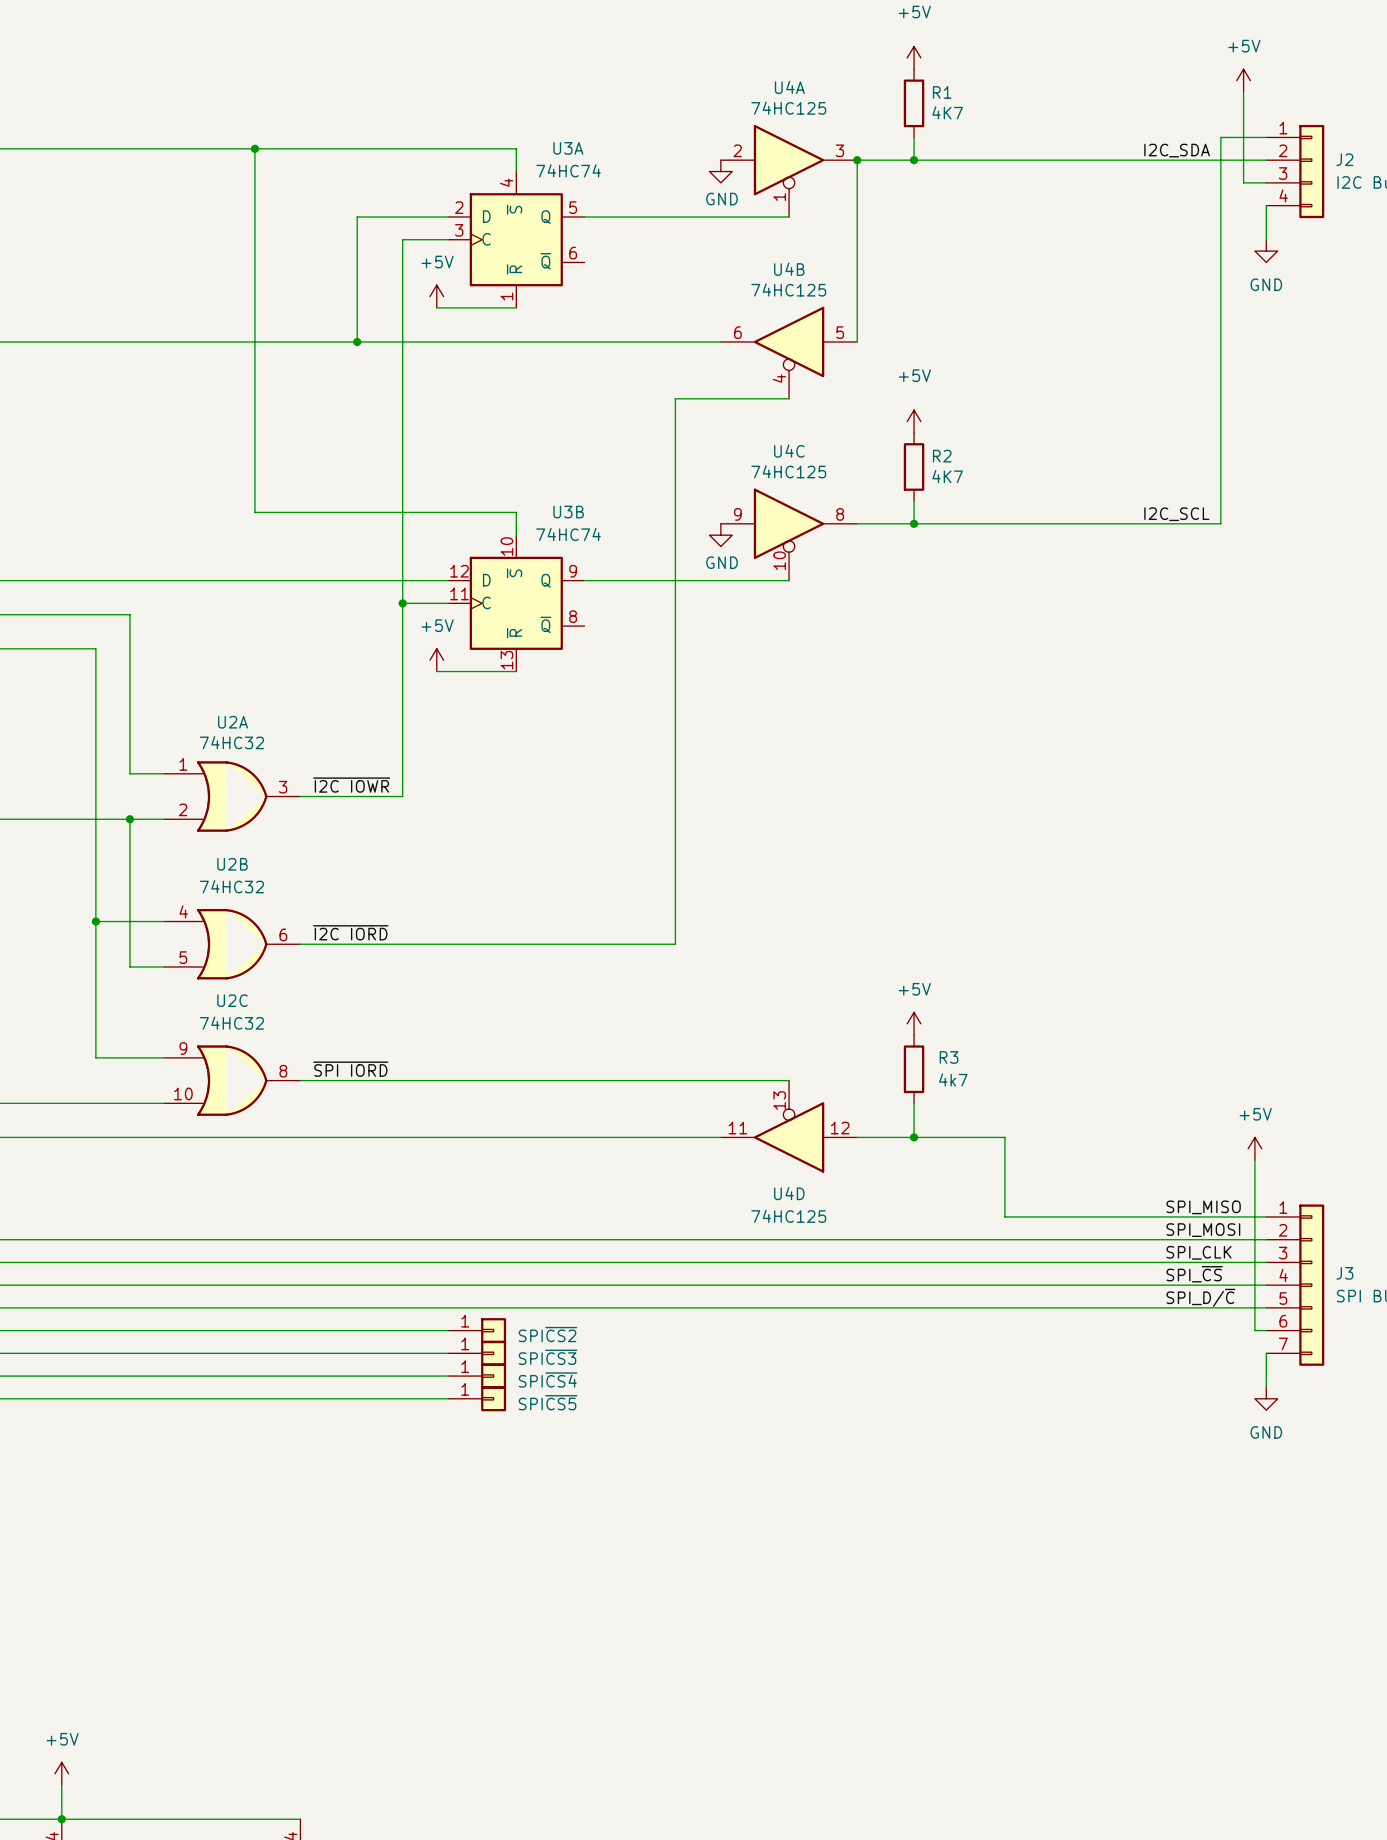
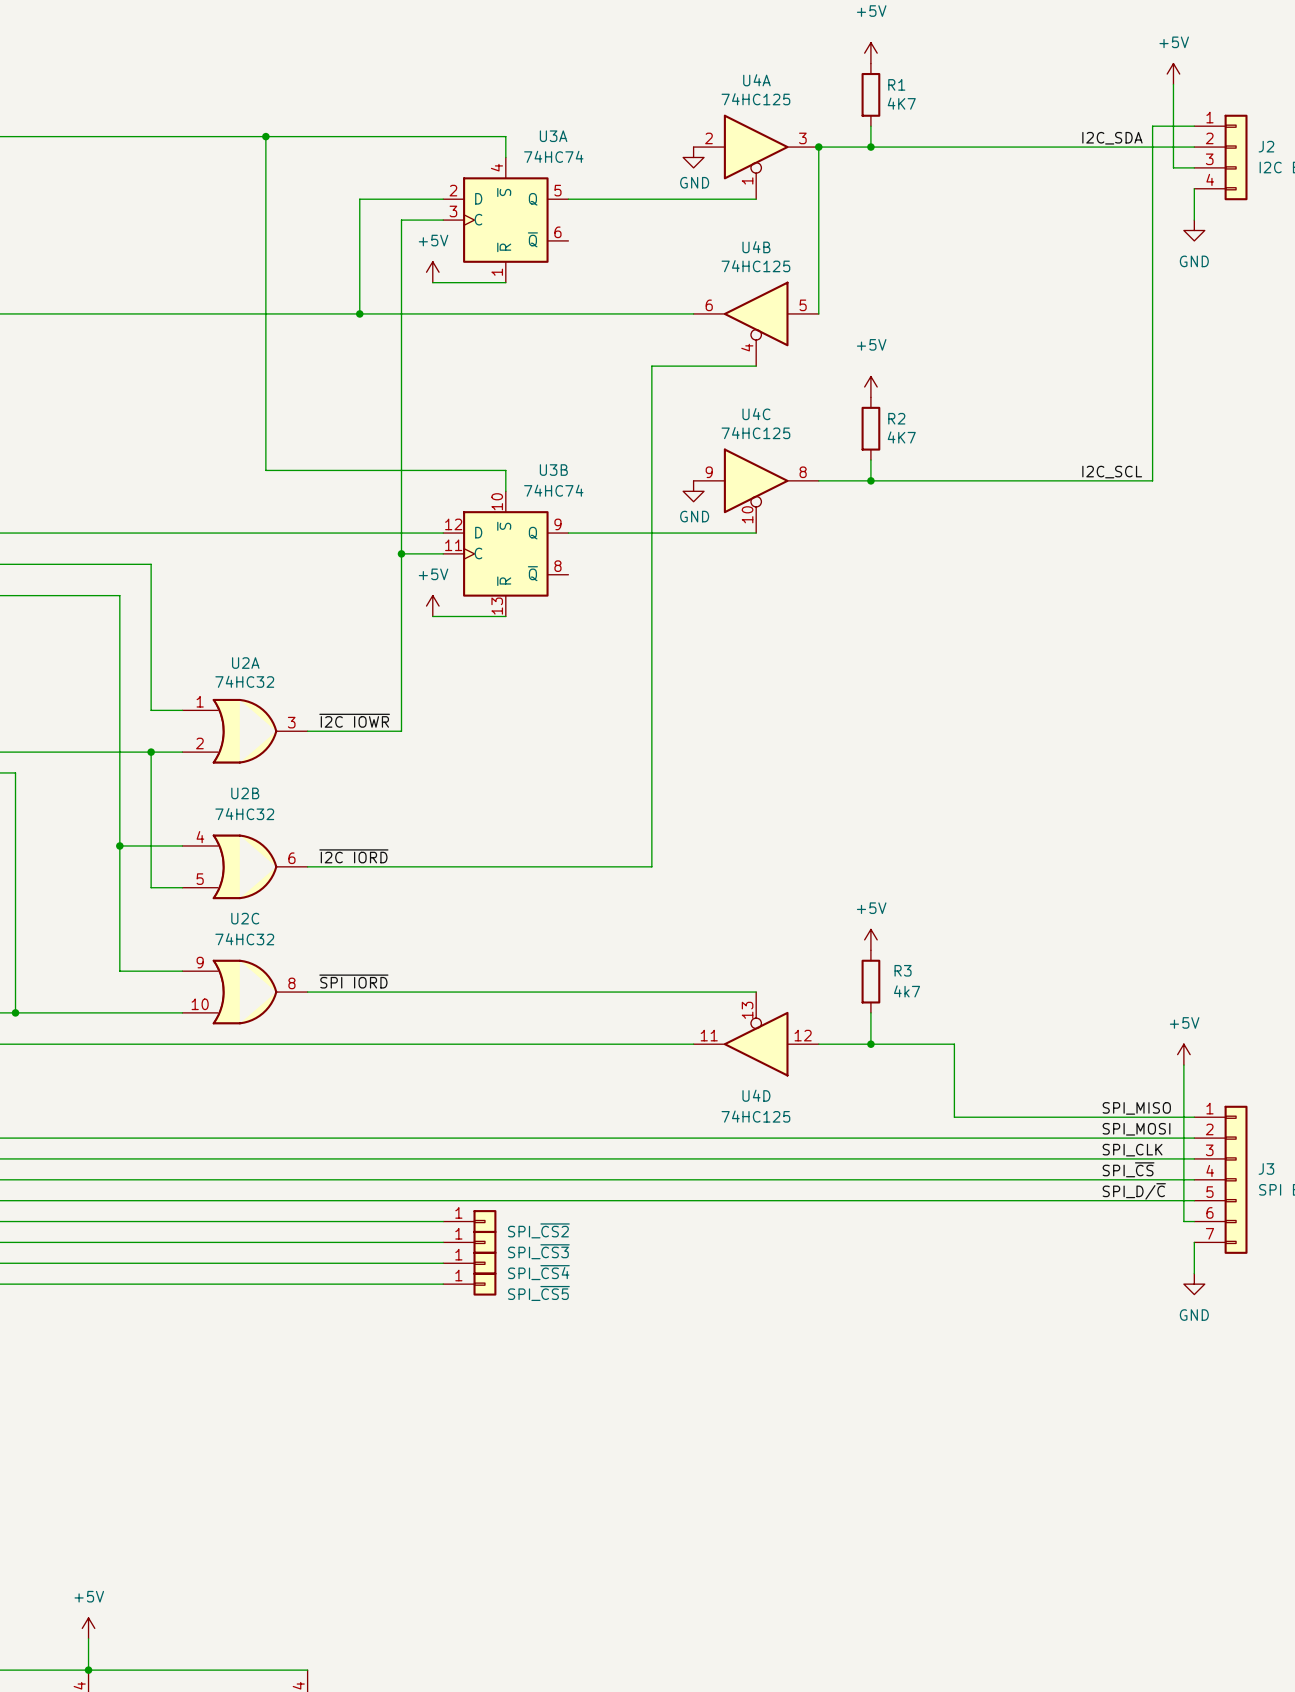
part value: SPI~{CS2} (548, 1334) -> SPI_~{CS2} (538, 1230)
part value: SPI~{CS3} (548, 1357) -> SPI_~{CS3} (538, 1251)
part value: SPI~{CS4} (548, 1380) -> SPI_~{CS4} (538, 1272)
part value: SPI~{CS5} (548, 1402) -> SPI_~{CS5} (538, 1293)

